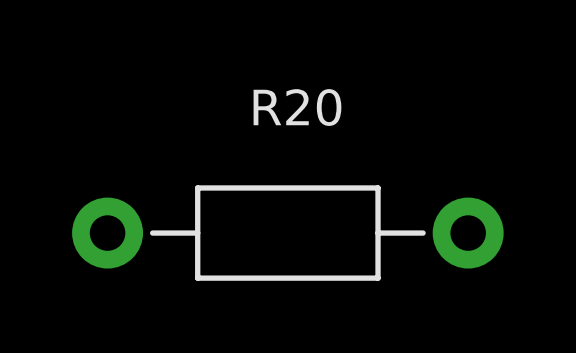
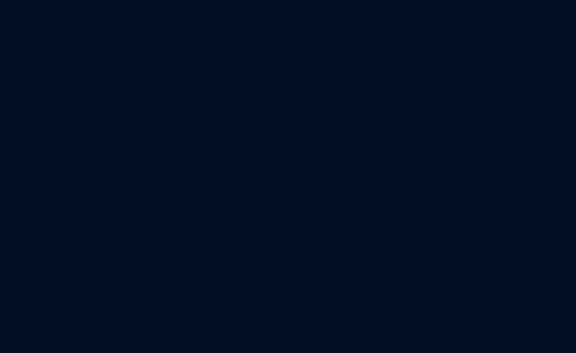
R20: (287, 233) -> none

